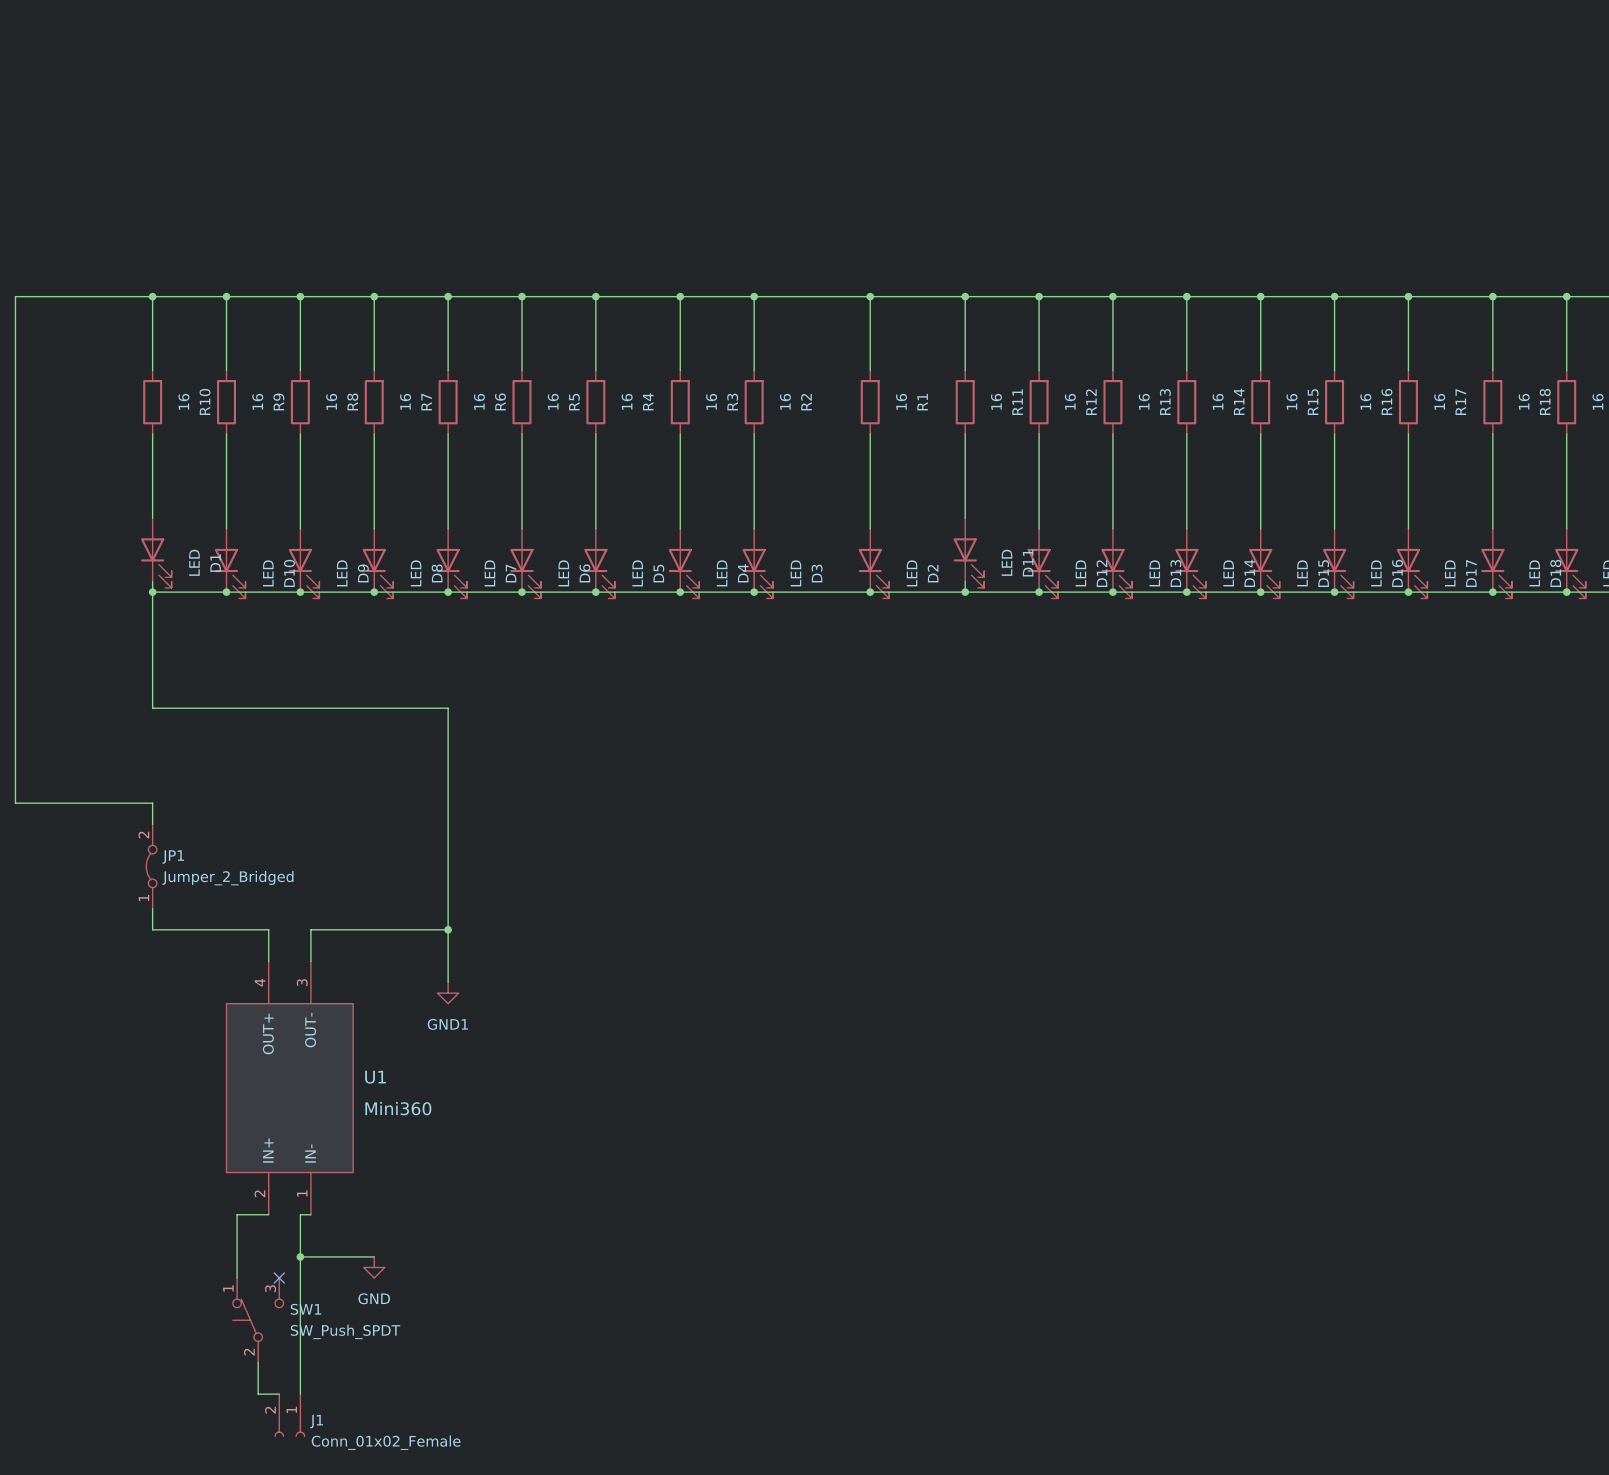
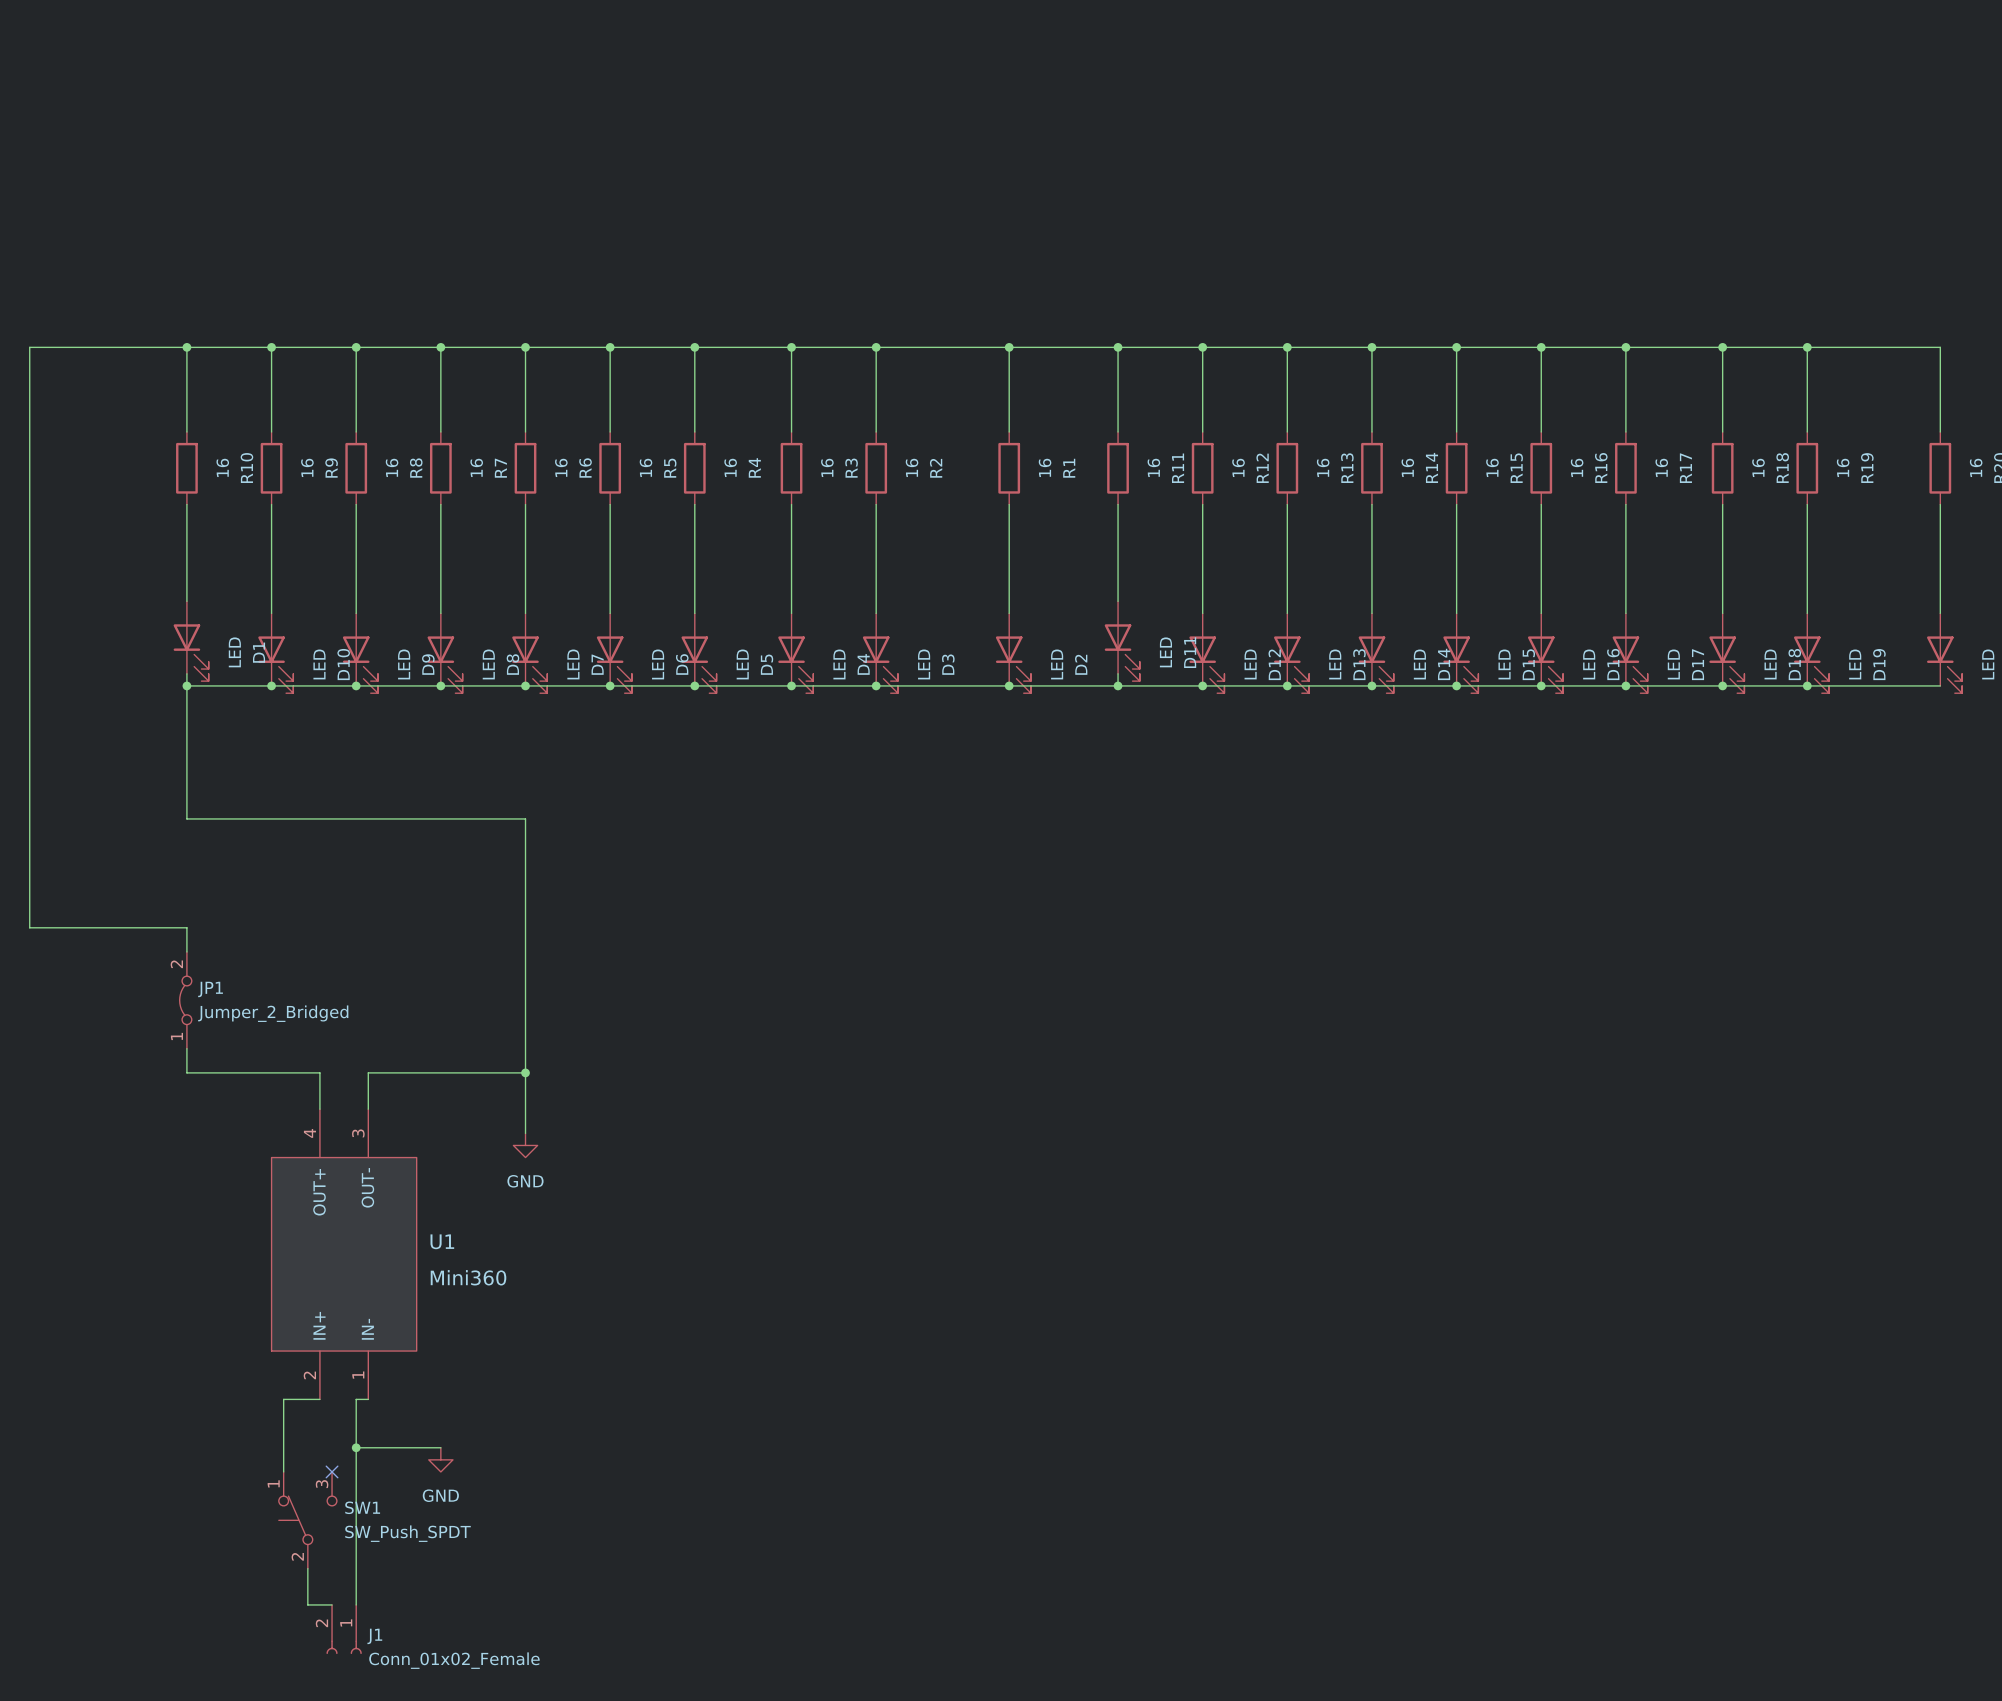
power symbol: GND1 (448, 993) -> GND (525, 1145)

